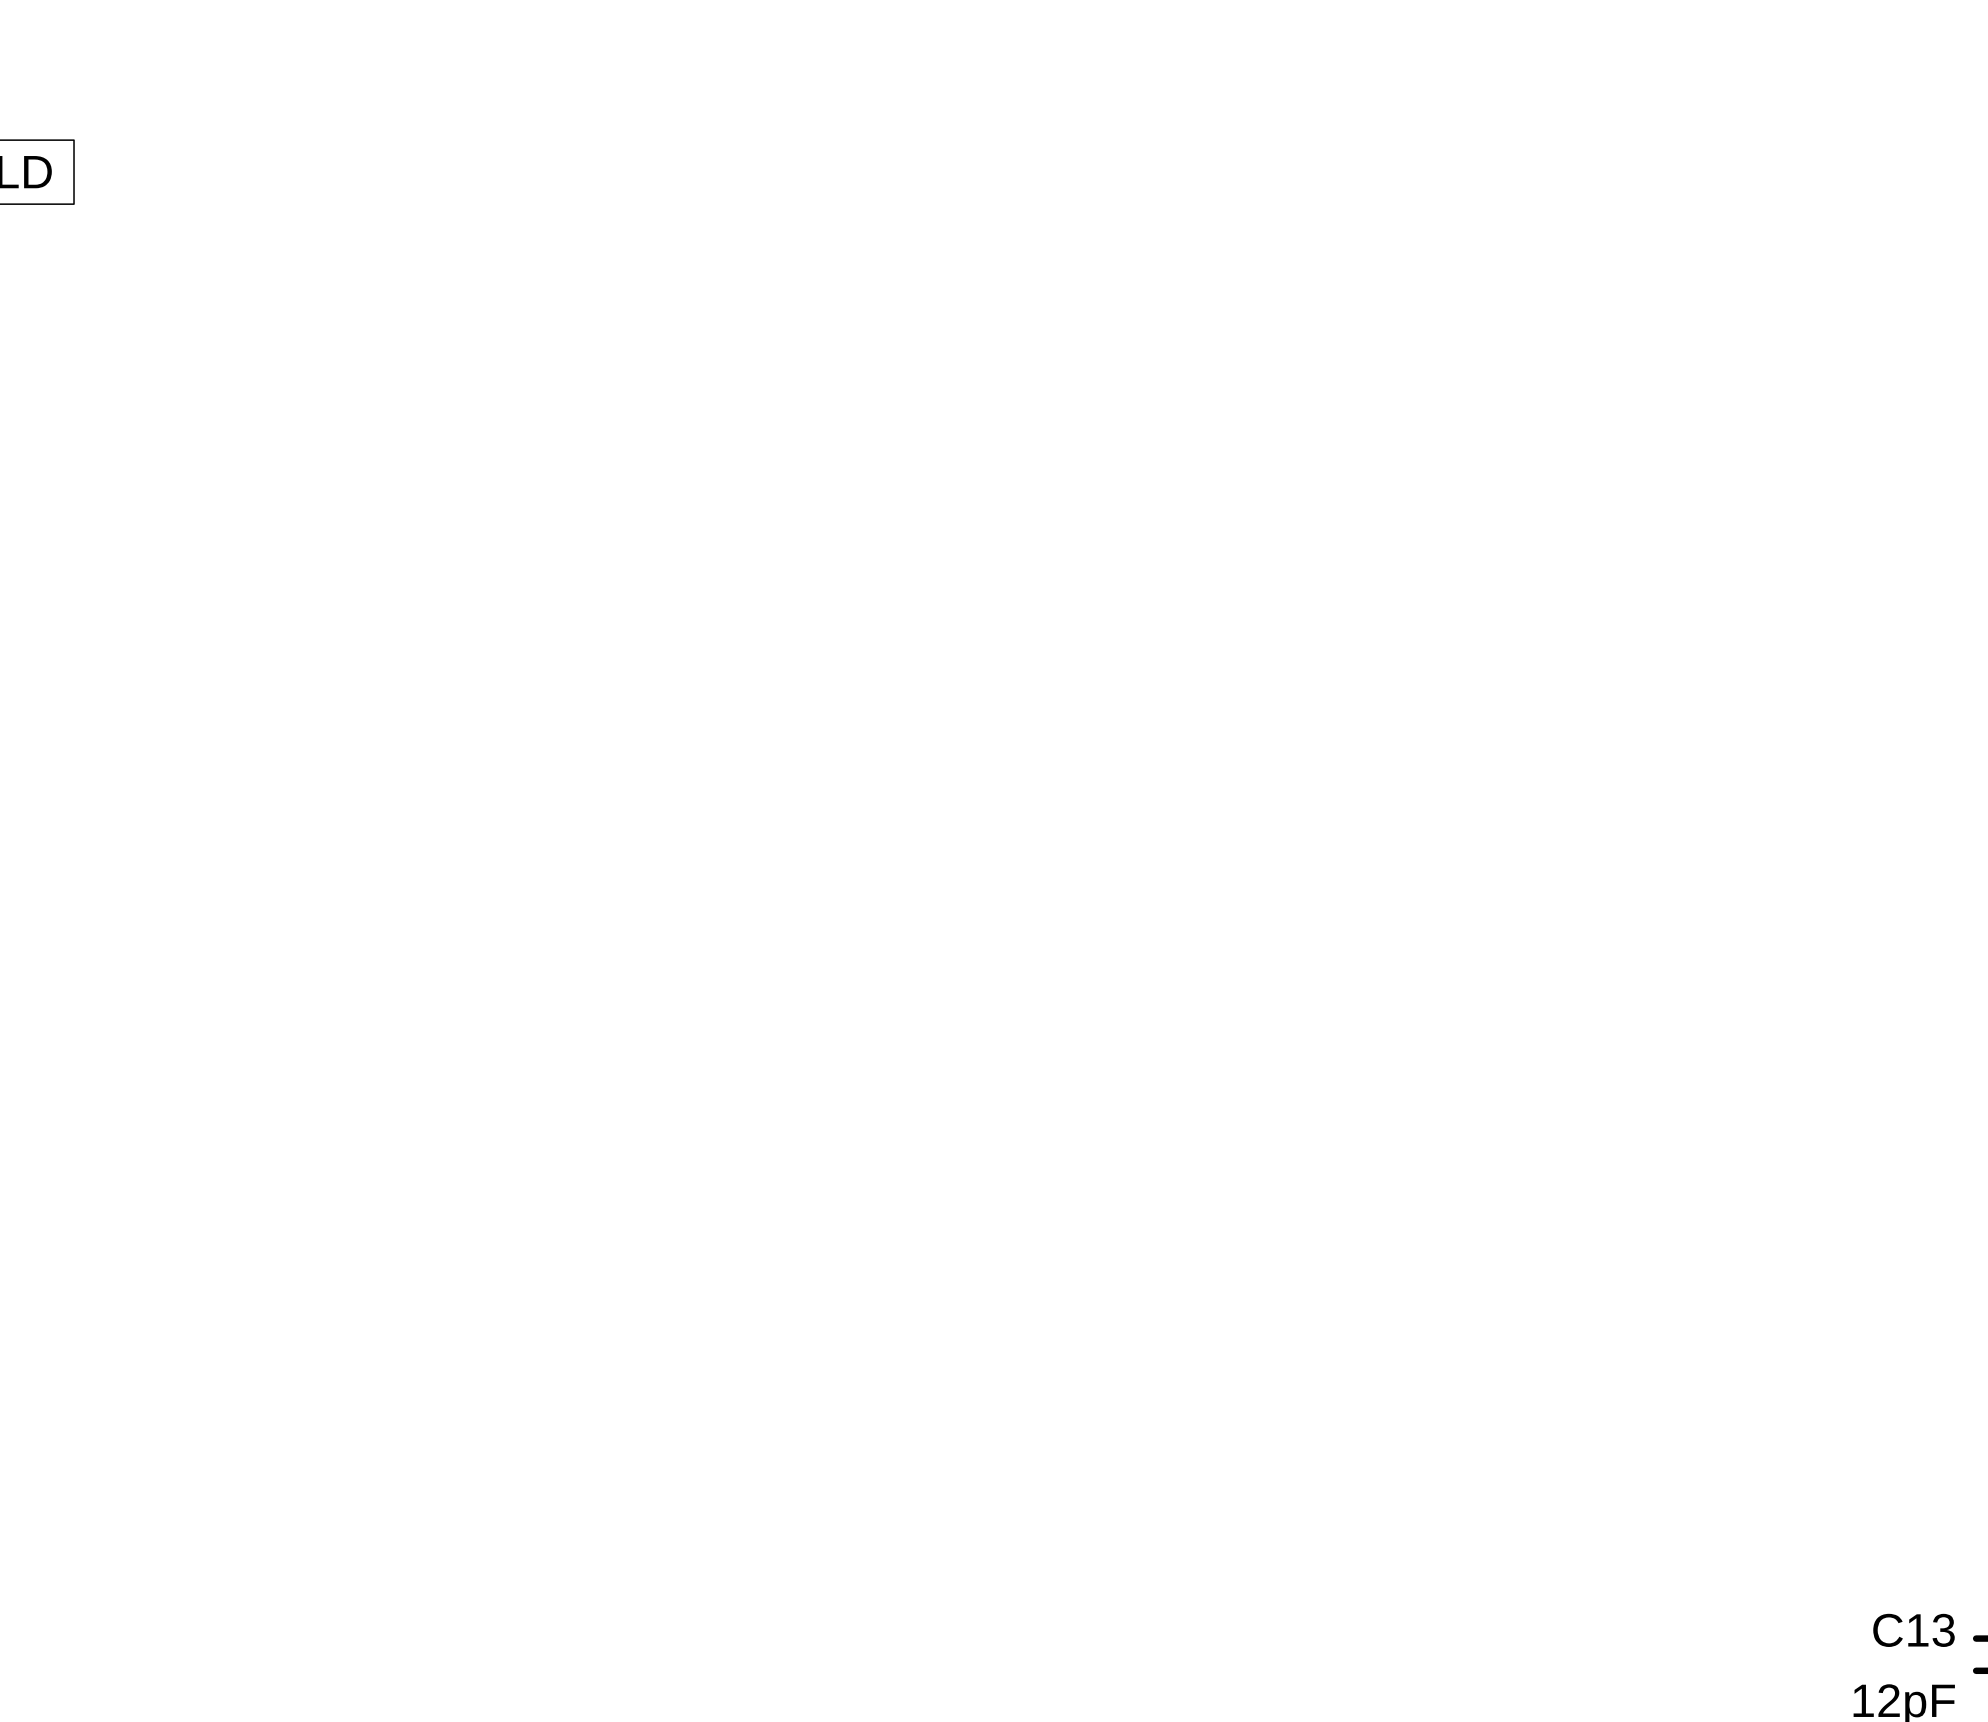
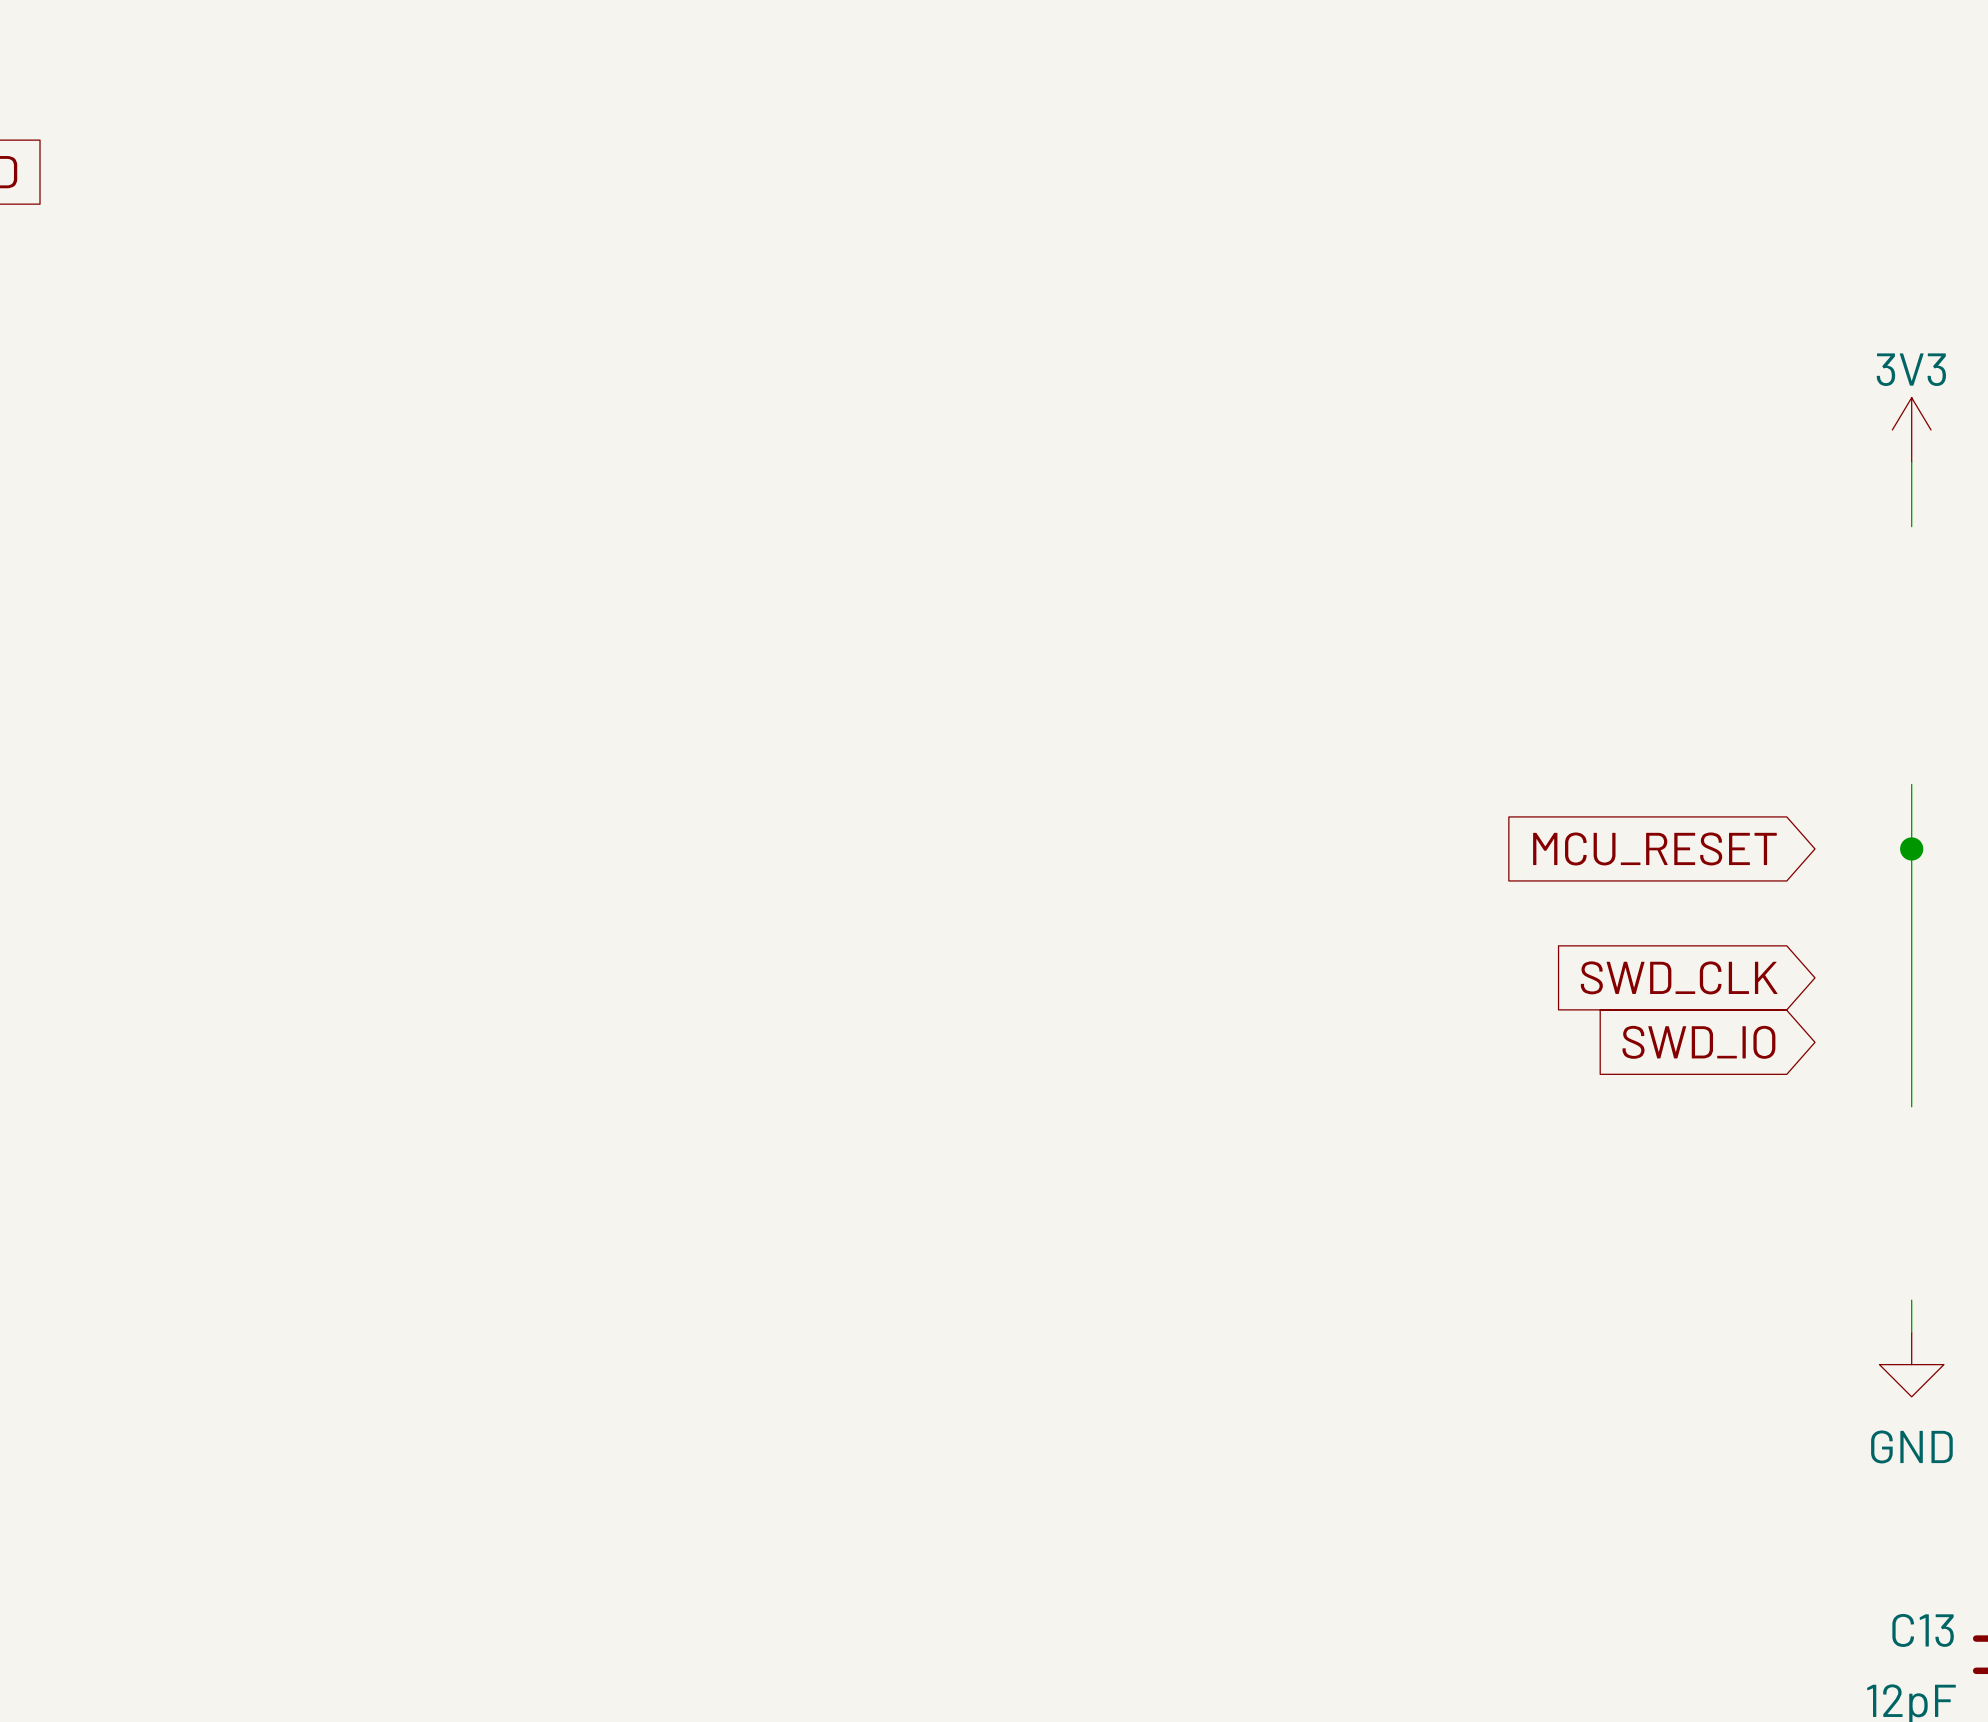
power symbol: none -> 3V3 (1911, 429)
wire: none -> (1911, 462) (1911, 526)
wire: none -> (1911, 784) (1911, 1106)
junction: none -> (1911, 848)
global label: none -> MCU_RESET (1654, 848)
global label: none -> SWD_CLK (1679, 977)
global label: none -> SWD_IO (1698, 1042)
wire: none -> (1911, 1300) (1911, 1332)
power symbol: none -> GND (1911, 1364)

